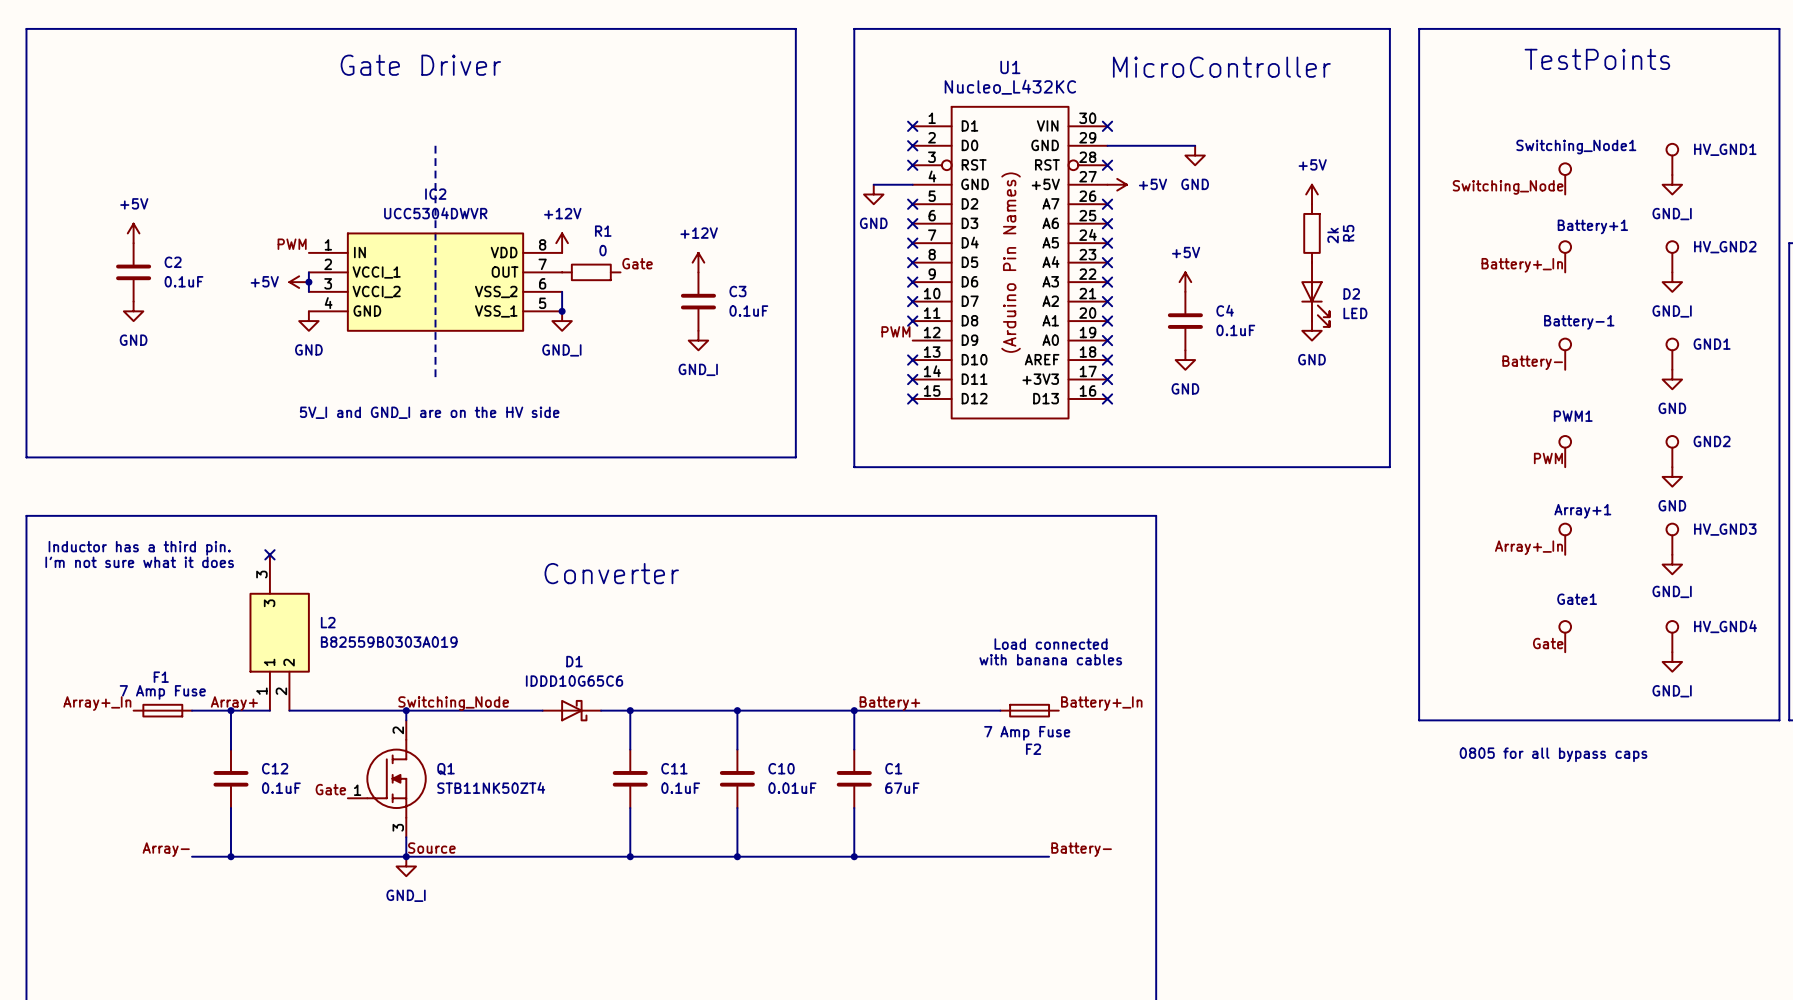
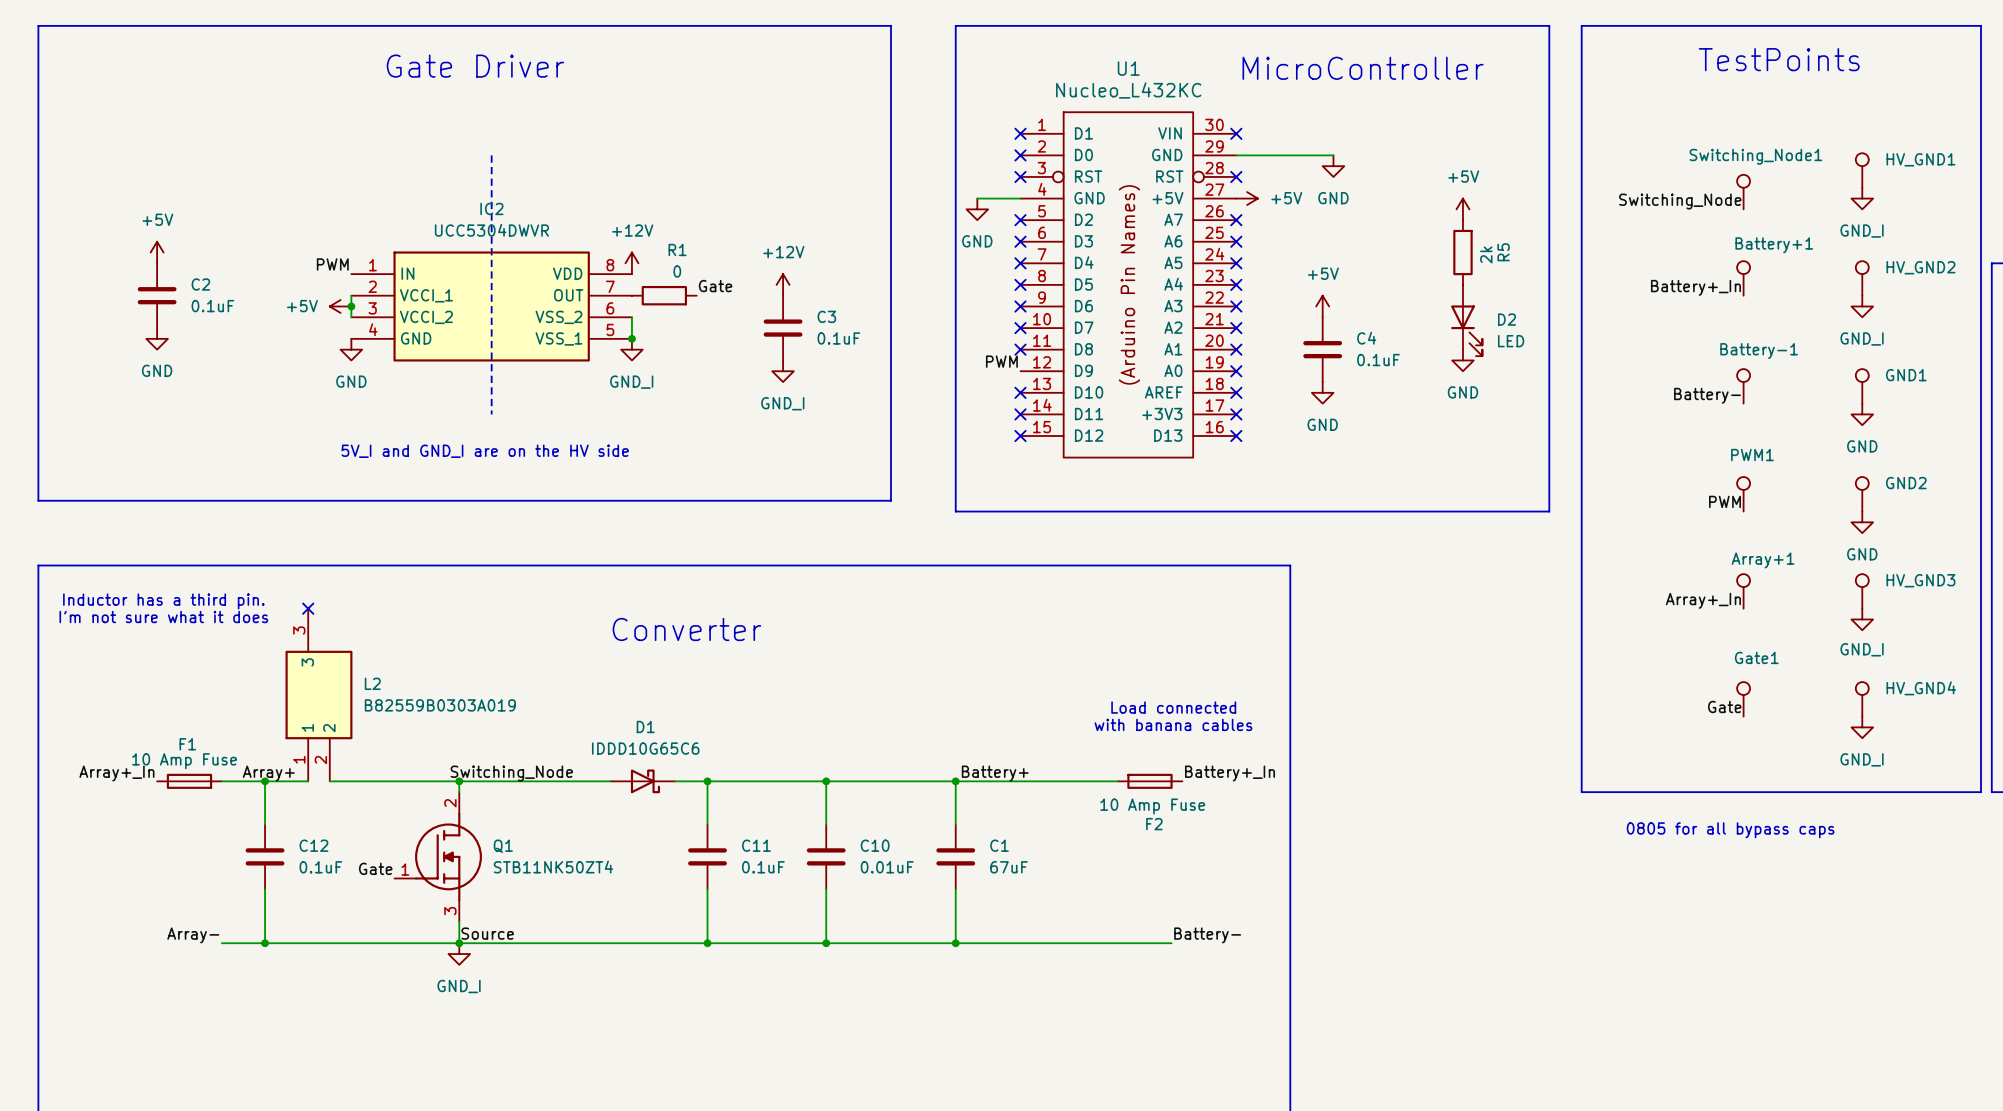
F1 value: 7 Amp Fuse (162, 692) -> 10 Amp Fuse (184, 761)
F2 value: 7 Amp Fuse (1027, 733) -> 10 Amp Fuse (1152, 806)

